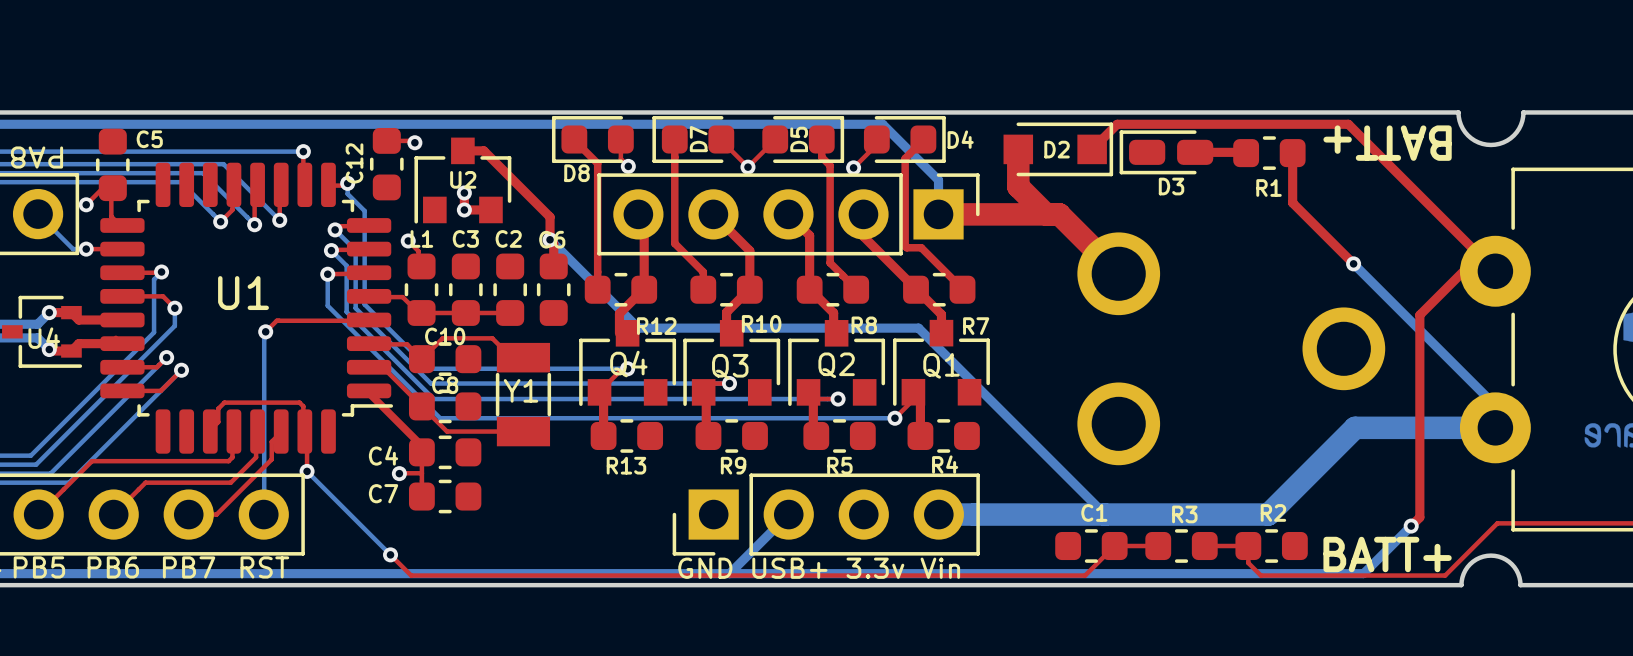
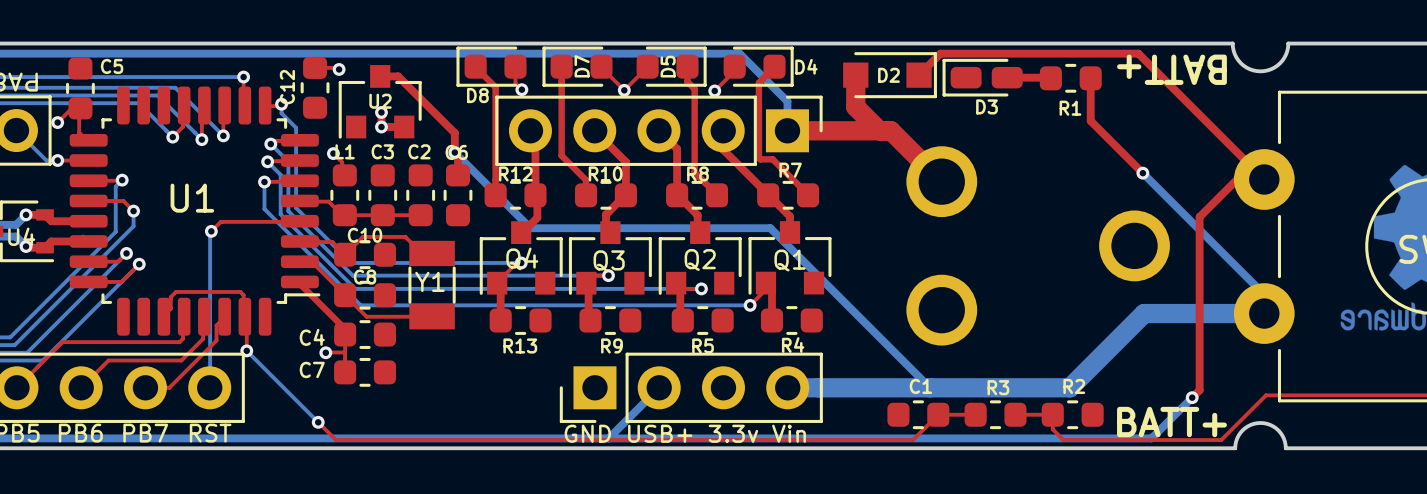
top track: (644, 288) (619, 313) (619, 333) -> none
top track: none -> (537, 195) (537, 217) (522, 232)
R10 name position: R10 (761, 323) -> R10 (605, 173)
R8 name position: R8 (864, 325) -> R8 (697, 173)
R12 name position: R12 (656, 326) -> R12 (515, 173)
R7 name position: R7 (976, 326) -> R7 (790, 170)

